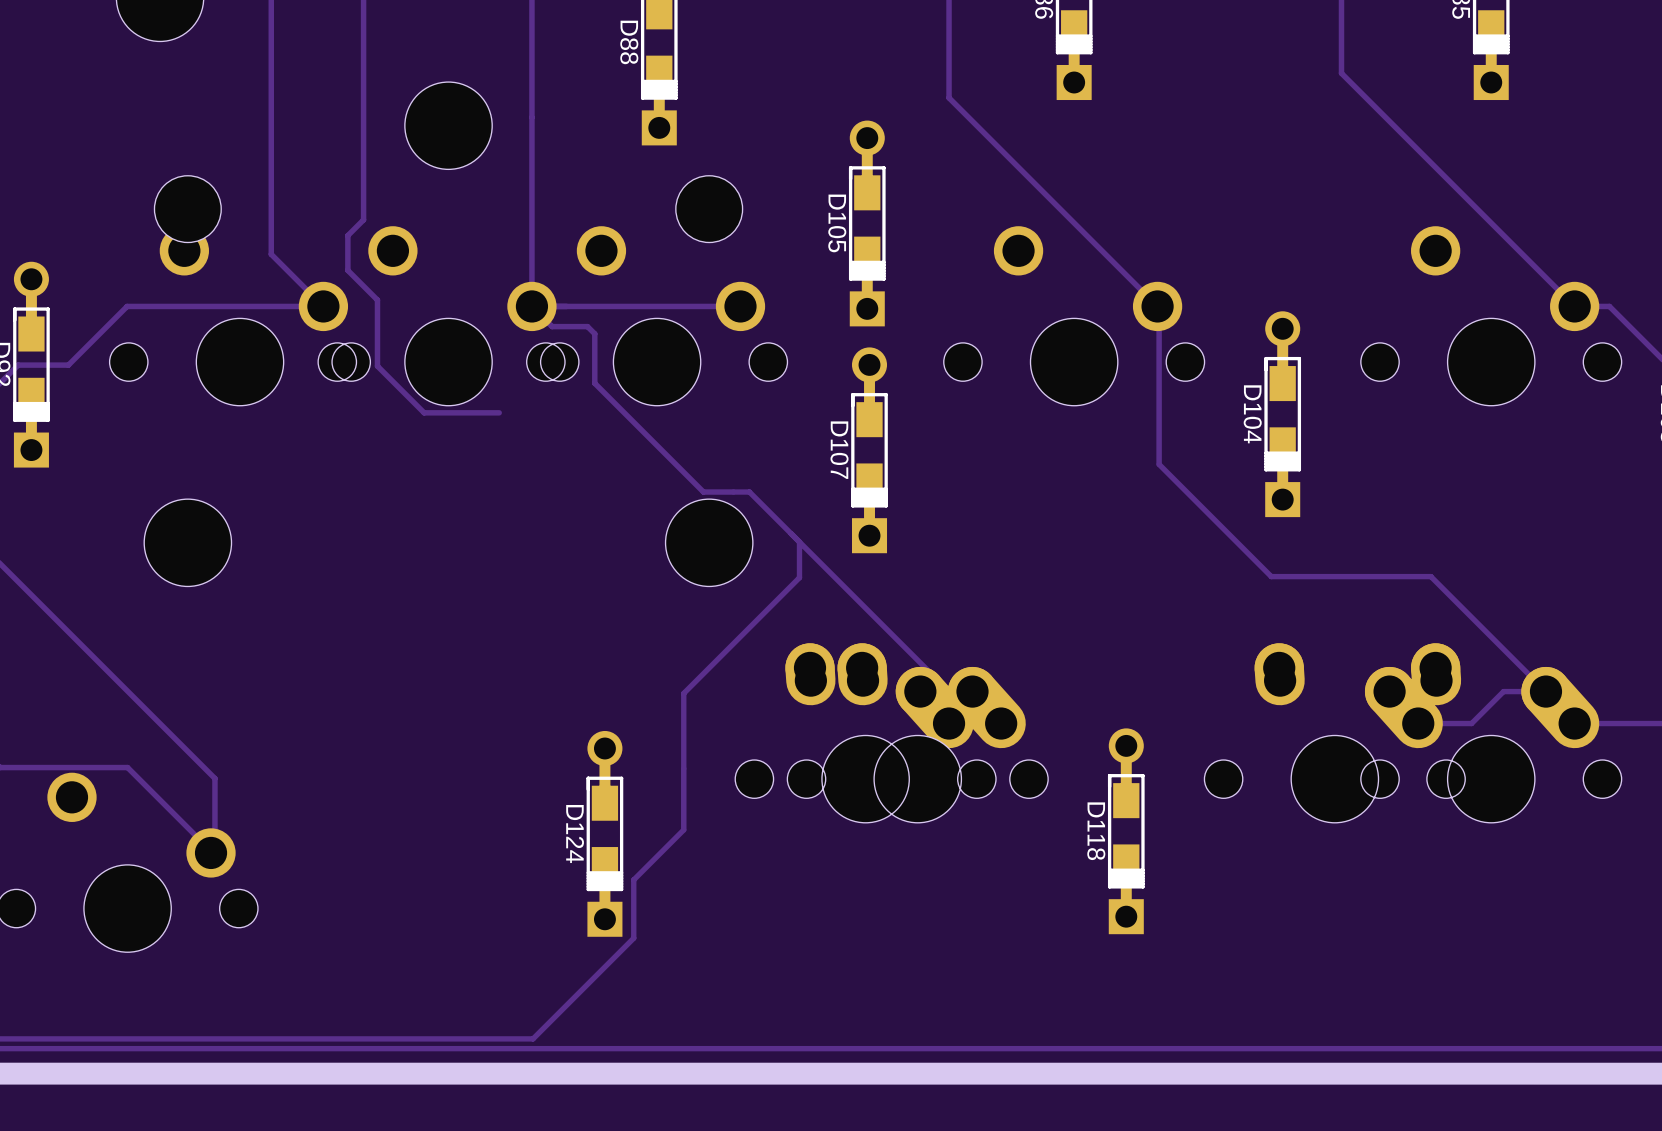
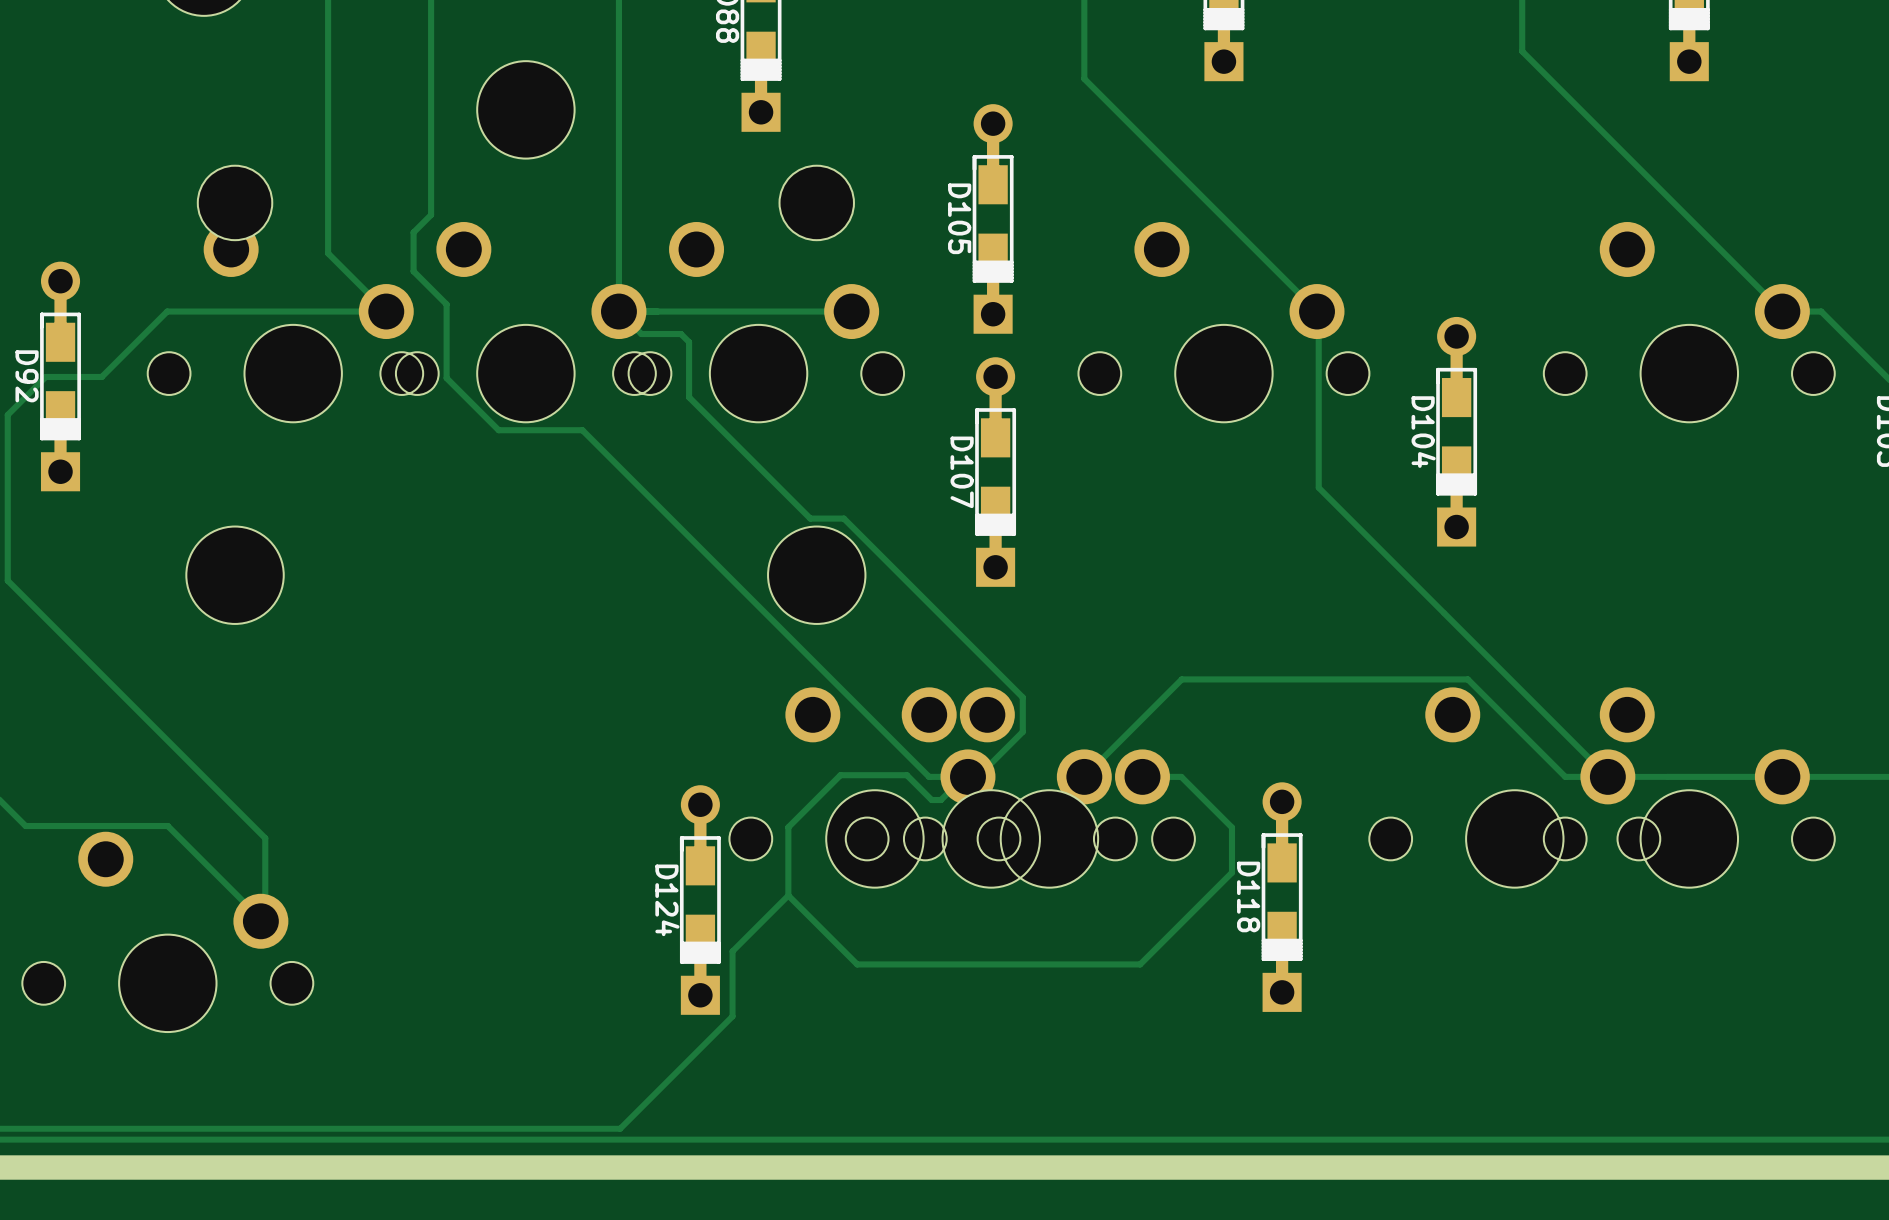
track: none -> (582, 430) (929, 776) (977, 776) (1022, 731) (1022, 697) (843, 518)
track: (733, 492) (749, 492) (949, 691) (949, 723) (1001, 723) -> (788, 895) (857, 964) (1140, 964) (1232, 872) (1232, 827) (1181, 776) (1142, 776)
track: (799, 542) (799, 577) (683, 693) (683, 768) -> (964, 776) (940, 800) (931, 800) (906, 775) (840, 775) (788, 827)
track: (1271, 576) (1430, 576) (1574, 720) (1574, 723) -> (1443, 612) (1607, 776) (1565, 776) (1467, 679) (1181, 679) (1084, 776)
part footprint: [735, 643, 996, 823] -> [845, 687, 1137, 888]
part footprint: [787, 643, 1049, 823] -> [903, 687, 1195, 888]
part footprint: [1204, 643, 1466, 823] -> [1369, 687, 1661, 888]
part footprint: [1360, 643, 1622, 823] -> [1543, 687, 1835, 888]
track: (1545, 691) (1503, 691) (1471, 723) -> (1782, 776) (1667, 776)
part: none -> (874, 787)

